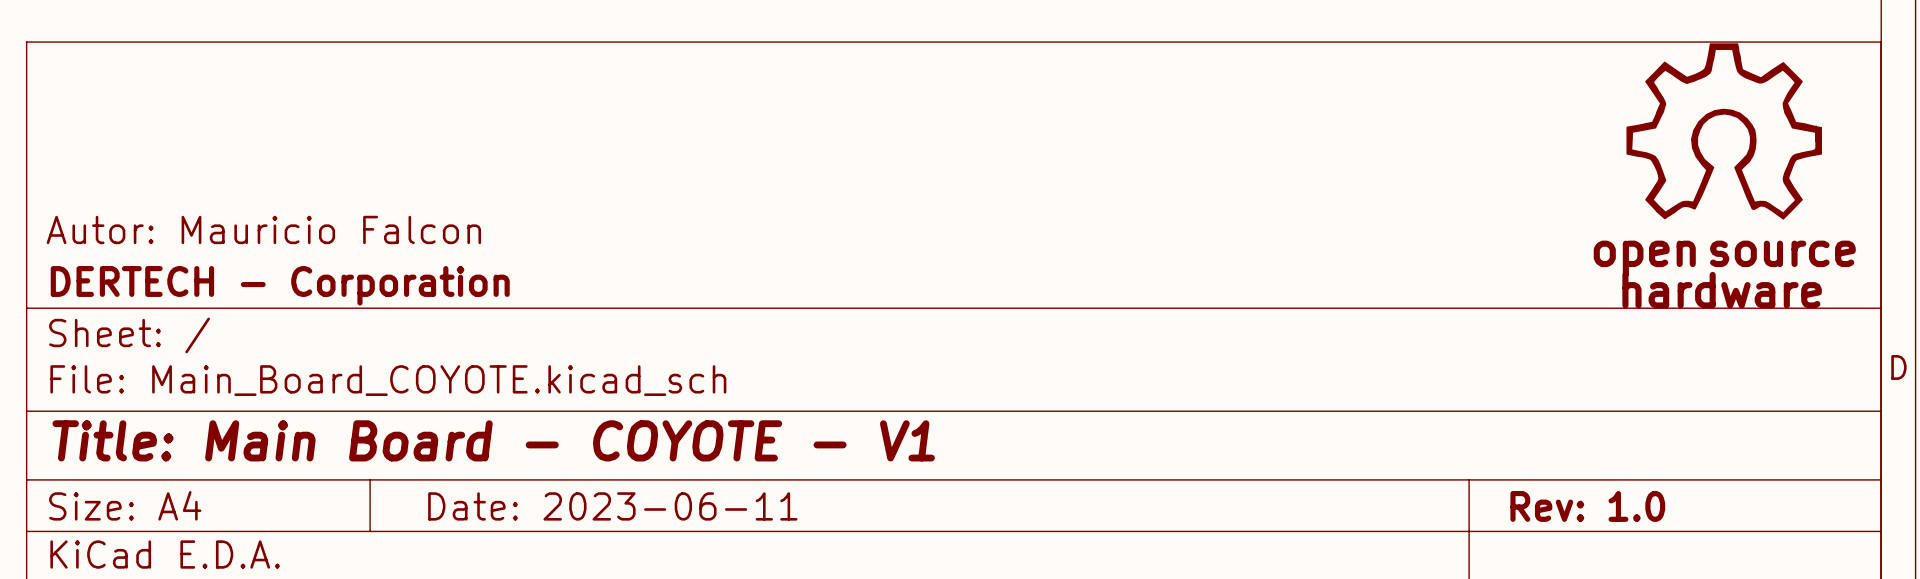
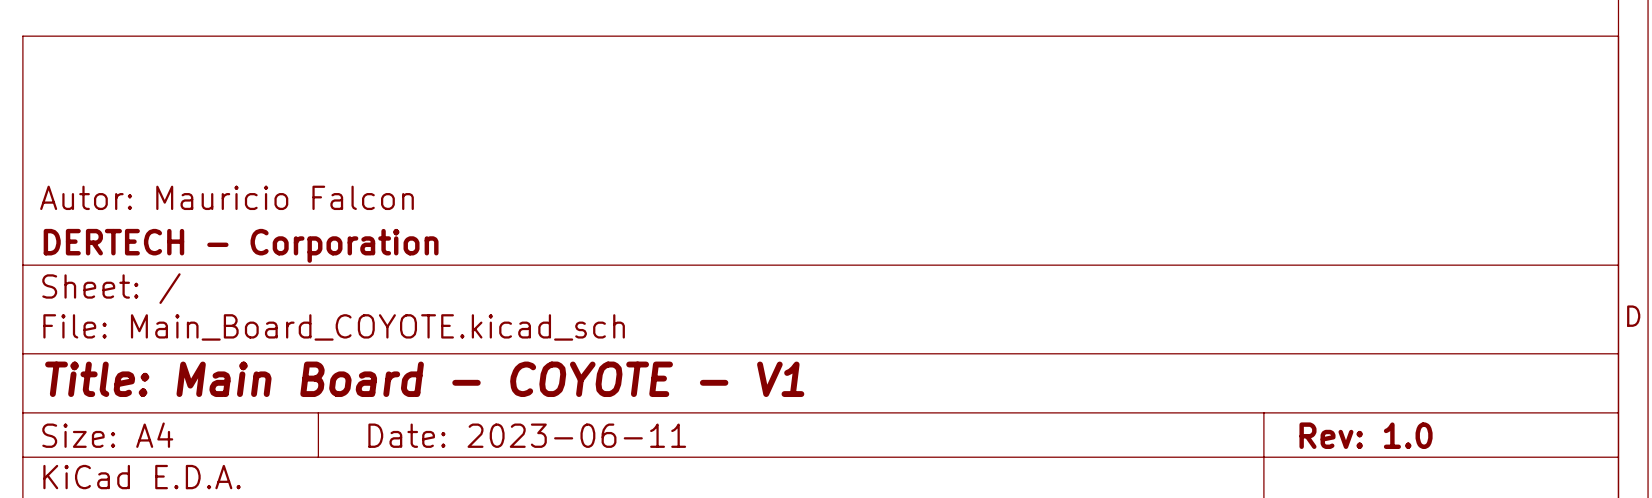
power symbol: (1724, 131) -> none

